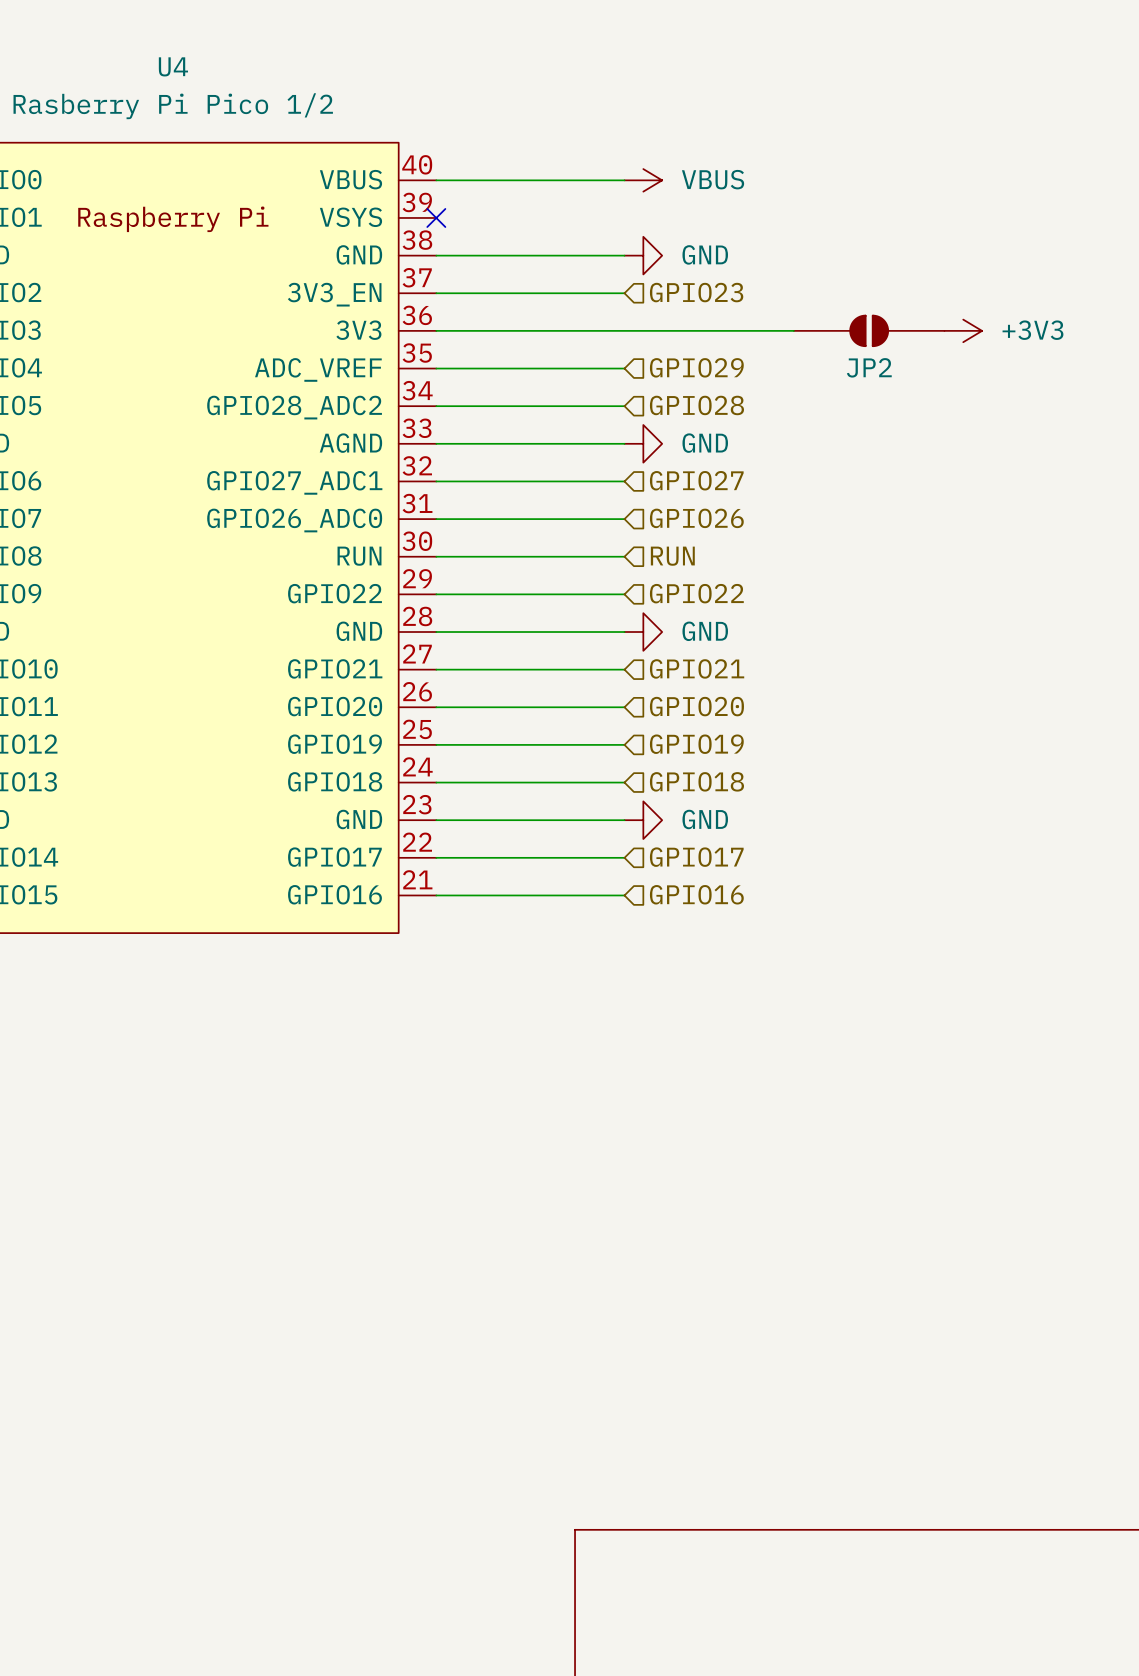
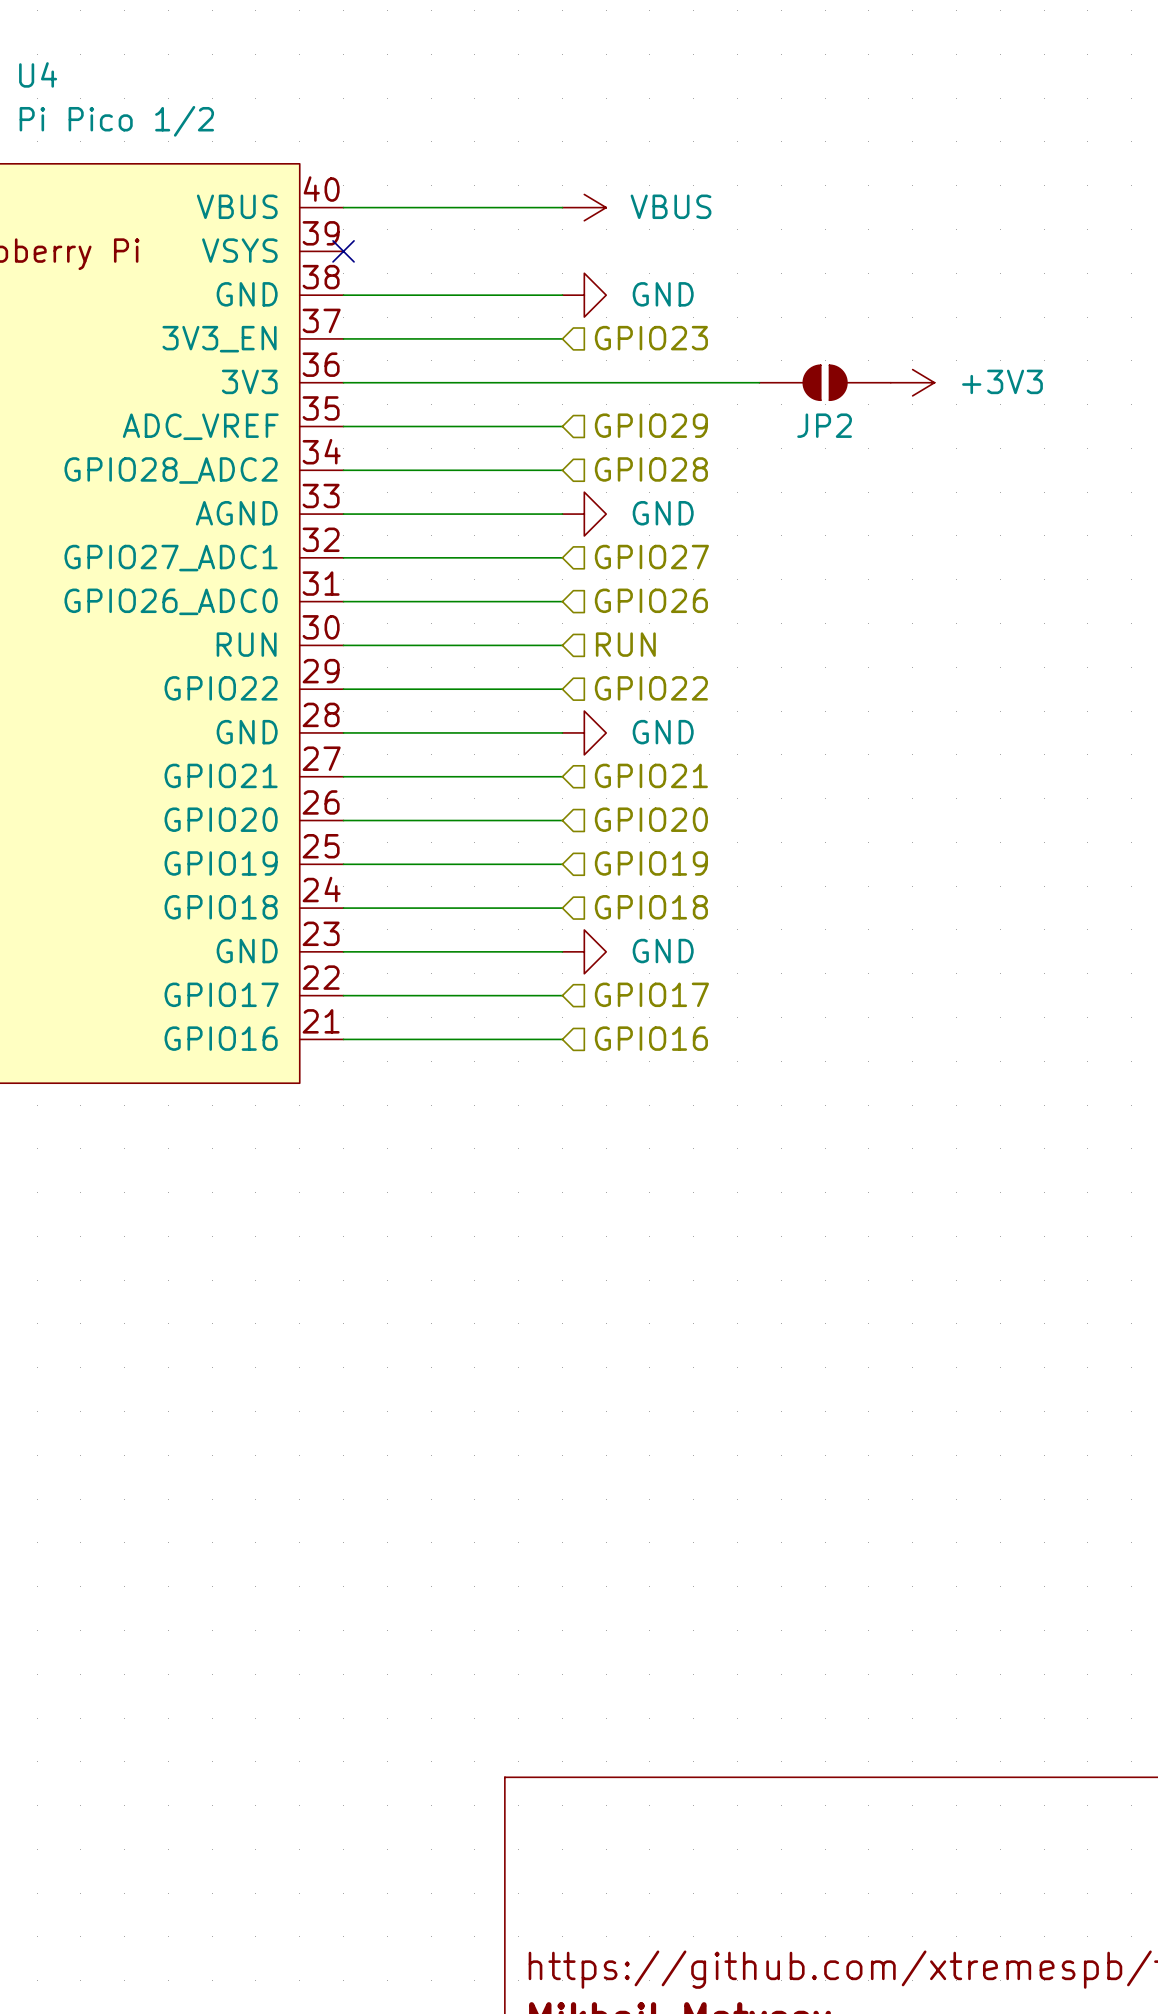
JP2 symbol: [793, 314, 945, 348] -> [759, 365, 891, 401]
power symbol position: +3V3 (963, 330) -> +3V3 (912, 382)

